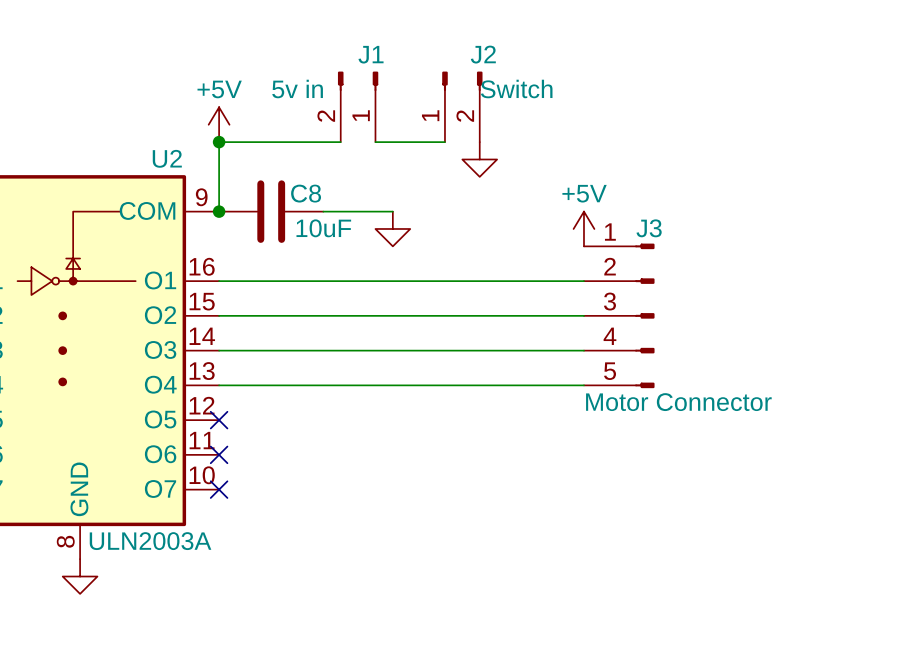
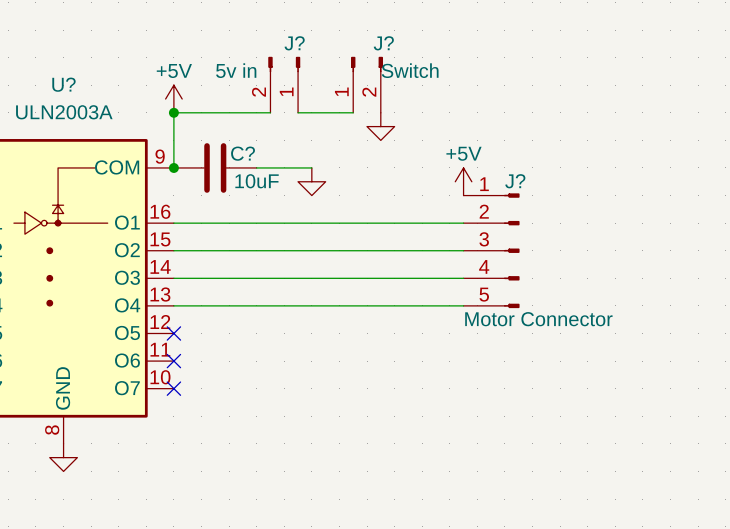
J1 name: J1 (371, 54) -> J? (294, 43)
J2 name: J2 (483, 54) -> J? (383, 43)
U2 name: U2 (167, 158) -> U? (63, 84)
C8 name: C8 (306, 193) -> C? (243, 153)
J3 name: J3 (649, 228) -> J? (515, 181)
U2 value position: ULN2003A (150, 541) -> ULN2003A (64, 112)

